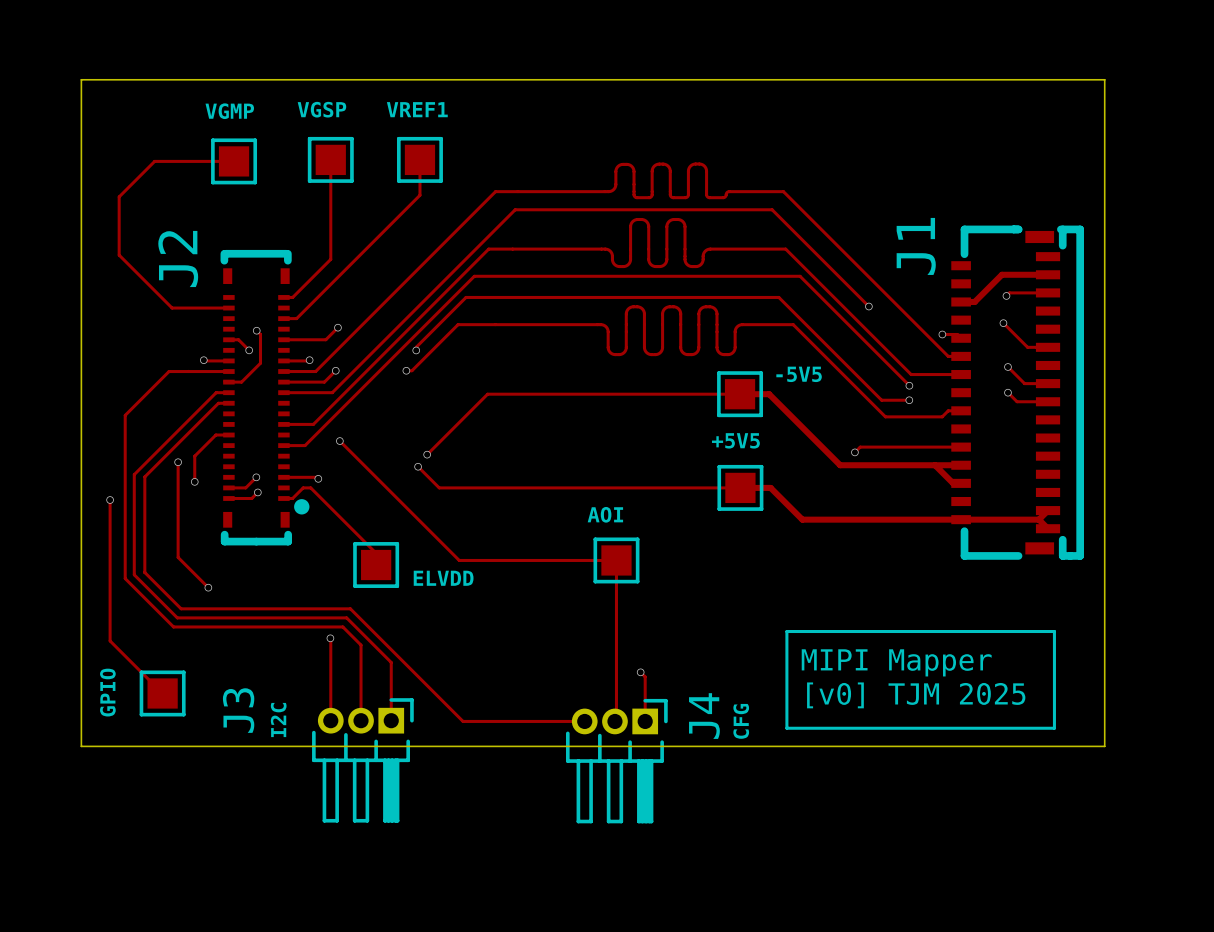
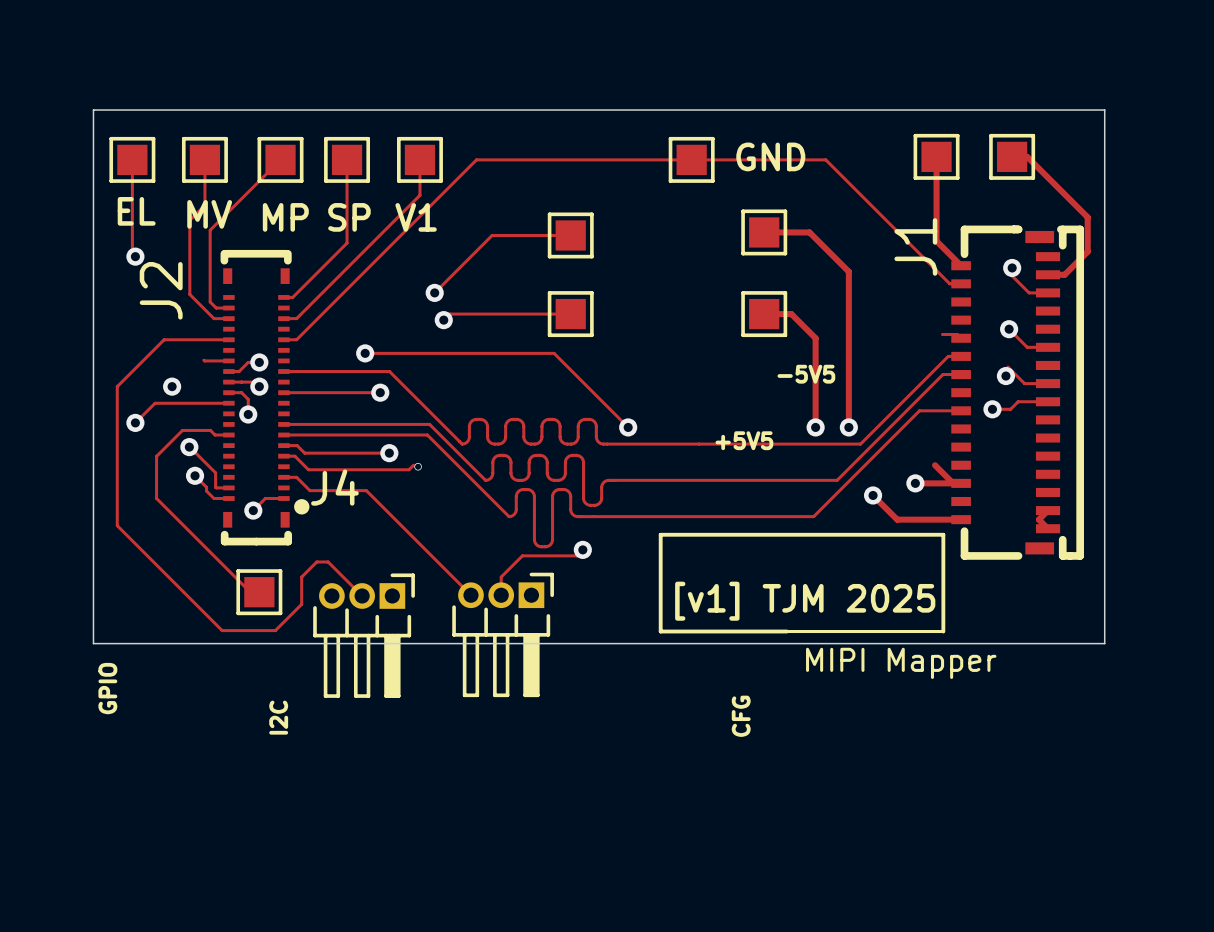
text: VGSP (321, 109) -> none
text: VREF1 (417, 109) -> none
board edge: (1104, 110) (1104, 79) (81, 79) (81, 746) (1104, 746) (1104, 643) -> (1104, 110) (93, 110) (93, 643) (1104, 643)
text: VGMP (229, 111) -> none
text: none -> GND (770, 156)
track: none -> (936, 156) (936, 241) (961, 265)
part: none -> (936, 156)
part: none -> (1012, 156)
track: none -> (132, 159) (132, 253) (135, 256)
part: none -> (132, 159)
track: none -> (204, 159) (204, 205) (189, 220) (189, 294) (213, 318) (228, 318)
part: none -> (204, 159)
part: none -> (280, 159)
track: (330, 159) (330, 259) -> (347, 159) (347, 243) (330, 259)
part position: (330, 159) -> (347, 159)
part: none -> (691, 159)
track: (234, 161) (154, 161) (119, 196) (119, 255) (172, 308) (216, 308) -> (280, 159) (210, 230) (210, 301) (216, 308)
part: (234, 161) -> none
text: none -> EL (136, 211)
text: none -> MV (209, 214)
text: none -> MP (285, 217)
text: none -> SP (349, 217)
text: none -> V1 (416, 217)
part: none -> (764, 232)
track: none -> (776, 232) (809, 232) (848, 271) (848, 427)
track: none -> (570, 235) (492, 235) (434, 292)
part: none -> (570, 235)
via: none -> (135, 256)
J2 name position: J2 (178, 258) -> J2 (161, 290)
via: none -> (1012, 267)
track: (1048, 274) (1001, 274) (974, 301) (961, 301) -> (1048, 274) (1064, 274) (1087, 251) (1087, 217) (1027, 156) (1012, 156)
via: none -> (434, 292)
track: (1029, 292) (1009, 292) (1006, 295) -> (1029, 292) (1012, 275) (1012, 267)
via: (1006, 295) -> none
track: (868, 306) (772, 209) (515, 209) (332, 392) -> (380, 392) (332, 392)
via: (868, 306) -> none
track: none -> (570, 314) (449, 314) (443, 320)
part: none -> (570, 314)
part: none -> (764, 314)
track: none -> (776, 314) (791, 314) (815, 338) (815, 427)
via size: [999, 319, 1008, 327] -> [1000, 320, 1019, 339]
via: none -> (443, 320)
track: (337, 327) (325, 339) (296, 339) -> (961, 283) (949, 283) (825, 159) (476, 159) (296, 339)
via: (337, 327) -> none
track: (256, 330) (260, 334) (260, 363) (241, 382) -> (259, 386) (254, 382) (241, 382)
via: (256, 330) -> none
via: (942, 334) -> none
track: (228, 339) (238, 339) (249, 350) -> (228, 339) (164, 339) (117, 386) (117, 525) (222, 630) (275, 630) (301, 604) (301, 577) (316, 561) (328, 561) (362, 595)
via size: [245, 346, 253, 355] -> [250, 353, 269, 372]
track: (416, 350) (416, 347) (466, 297) (778, 297) (881, 400) (909, 400) -> none
via: (416, 350) -> none
track: none -> (365, 353) (554, 353) (628, 427)
via: none -> (365, 353)
track: (948, 356) (783, 191) (728, 191) (724, 197) (708, 197) (706, 195) (706, 168) (702, 164) (695, 164) (691, 165) (688, 169) (687, 196) (672, 197) (670, 195) (669, 168) (666, 164) (659, 164) (654, 165) (652, 169) (651, 196) (636, 197) (634, 195) (633, 169) (629, 165) (623, 164) (616, 168) (615, 186) (610, 191) (495, 191) (315, 371) -> (948, 356) (860, 444) (602, 444) (596, 439) (595, 422) (589, 419) (579, 422) (577, 439) (570, 444) (564, 443) (561, 440) (559, 424) (554, 419) (547, 419) (543, 422) (541, 439) (534, 444) (528, 443) (524, 440) (521, 421) (510, 419) (505, 425) (504, 440) (500, 443) (494, 444) (487, 439) (485, 422) (481, 419) (475, 419) (469, 424) (468, 439) (462, 444) (389, 371) (315, 371)
via: (203, 360) -> none
track: (309, 360) (283, 360) -> none
via: (309, 360) -> none
via size: [1004, 363, 1012, 371] -> [996, 366, 1016, 386]
track: (335, 370) (324, 382) (283, 382) -> none
via: (335, 370) -> none
track: (406, 370) (411, 370) (458, 324) (602, 324) (607, 330) (609, 351) (613, 354) (620, 354) (626, 348) (626, 312) (632, 306) (640, 307) (644, 311) (644, 348) (647, 353) (656, 354) (661, 351) (662, 312) (666, 307) (673, 306) (677, 308) (680, 312) (681, 350) (685, 354) (693, 354) (698, 348) (699, 311) (702, 307) (710, 306) (716, 312) (717, 348) (721, 353) (729, 354) (734, 351) (735, 330) (739, 325) (793, 324) (885, 416) (942, 416) (948, 410) -> (283, 435) (427, 435) (509, 516) (515, 511) (516, 495) (518, 491) (527, 489) (532, 491) (534, 496) (534, 541) (538, 546) (545, 546) (549, 545) (552, 541) (552, 495) (554, 491) (559, 489) (565, 489) (569, 492) (571, 511) (577, 516) (813, 516) (919, 410) (948, 410)
via: (406, 370) -> none
track: (228, 371) (169, 371) (125, 415) (125, 578) (173, 626) (342, 626) (361, 645) (361, 720) -> (228, 371) (239, 371) (248, 362) (259, 362)
track: (942, 374) (911, 374) (785, 249) (708, 249) (703, 253) (701, 264) (690, 266) (685, 260) (684, 224) (680, 220) (673, 219) (668, 221) (666, 225) (666, 261) (662, 266) (654, 266) (648, 260) (648, 224) (644, 220) (637, 219) (630, 225) (630, 260) (624, 266) (614, 264) (611, 252) (606, 249) (488, 249) (313, 424) -> (942, 374) (837, 480) (608, 480) (602, 484) (601, 500) (595, 505) (587, 504) (583, 500) (583, 461) (577, 455) (571, 455) (566, 458) (564, 475) (558, 480) (552, 479) (548, 476) (547, 460) (543, 456) (535, 455) (531, 457) (528, 476) (524, 479) (518, 480) (511, 475) (509, 458) (505, 455) (498, 455) (493, 460) (492, 476) (485, 480) (429, 424) (313, 424)
track: (909, 385) (800, 276) (474, 276) (305, 445) (297, 445) -> (389, 453) (304, 453) (297, 445)
via: (909, 385) -> none
via: none -> (172, 386)
via: none -> (259, 386)
track: (228, 392) (216, 392) (134, 474) (134, 574) (177, 617) (346, 617) (391, 662) (391, 720) -> (228, 392) (241, 392) (248, 399) (248, 414)
via: none -> (380, 392)
track: (1007, 392) (1018, 401) -> (992, 409) (1010, 409) (1018, 401)
via: (1007, 392) -> none
part: (740, 394) -> none
via: (909, 400) -> none
track: (218, 403) (144, 476) (144, 572) (181, 608) (350, 608) (463, 721) (584, 721) -> (218, 403) (155, 403) (135, 422)
via: none -> (992, 409)
via: none -> (248, 414)
via: none -> (135, 422)
via: none -> (628, 427)
via: none -> (815, 427)
via: none -> (848, 427)
track: (215, 435) (194, 456) (194, 481) -> (215, 435) (210, 430) (182, 430) (156, 456) (156, 498) (250, 592) (259, 592)
track: (339, 441) (459, 560) (616, 560) (614, 721) -> none
via: (339, 441) -> none
via: none -> (189, 447)
track: (961, 447) (860, 447) (854, 452) -> none
via: (854, 452) -> none
via: none -> (389, 453)
track: (427, 454) (487, 394) (769, 394) (840, 465) (961, 465) -> none
via: (427, 454) -> none
track: none -> (283, 456) (294, 456) (308, 469) (409, 469) (413, 465)
track: (178, 462) (178, 557) (208, 587) -> none
via: (178, 462) -> none
track: (418, 466) (439, 487) (770, 487) (802, 519) (897, 519) -> (873, 495) (897, 519)
track: (256, 477) (245, 487) (228, 487) -> (189, 447) (215, 472) (215, 487) (228, 487)
via: (256, 477) -> none
track: (296, 477) (318, 478) -> (296, 477) (309, 490) (366, 490) (470, 595)
via size: [190, 478, 199, 486] -> [185, 466, 205, 485]
via: (318, 478) -> none
via: none -> (915, 483)
part: (740, 487) -> none
track: (257, 492) (251, 498) (228, 498) -> (195, 475) (213, 498) (228, 498)
via: (257, 492) -> none
via: none -> (873, 495)
track: (283, 498) (292, 498) (303, 487) (310, 487) (376, 553) (376, 565) -> (283, 498) (265, 498) (253, 510)
track: (110, 500) (110, 640) (162, 693) -> none
via: (110, 500) -> none
via: none -> (253, 510)
text: AOI (605, 514) -> none
track: (961, 519) (1038, 519) -> none
track: none -> (582, 549) (576, 555) (522, 555) (501, 577) (501, 595)
via: none -> (582, 549)
part: (616, 560) -> none
part: (376, 565) -> none
text: ELVDD (443, 578) -> none
via: (208, 587) -> none
part: none -> (259, 592)
text: none -> [v1] TJM 2025 (805, 601)
line: (786, 631) (786, 728) (1054, 728) (1054, 631) (943, 631) -> (786, 631) (660, 631) (660, 534) (943, 534) (943, 631)
part: none -> (503, 634)
track: (330, 638) (330, 720) -> none
via: (330, 638) -> none
track: (640, 672) (645, 676) (645, 721) -> none
via: (640, 672) -> none
part: (162, 693) -> none
text: [v0] TJM 2025 (916, 695) -> none
J4 name rotation: 0° (704, 716) -> 90° clockwise (334, 487)
J4 name position: J4 (704, 716) -> J4 (334, 487)
J3: (362, 760) -> none
J4 position: (616, 761) -> (364, 635)

